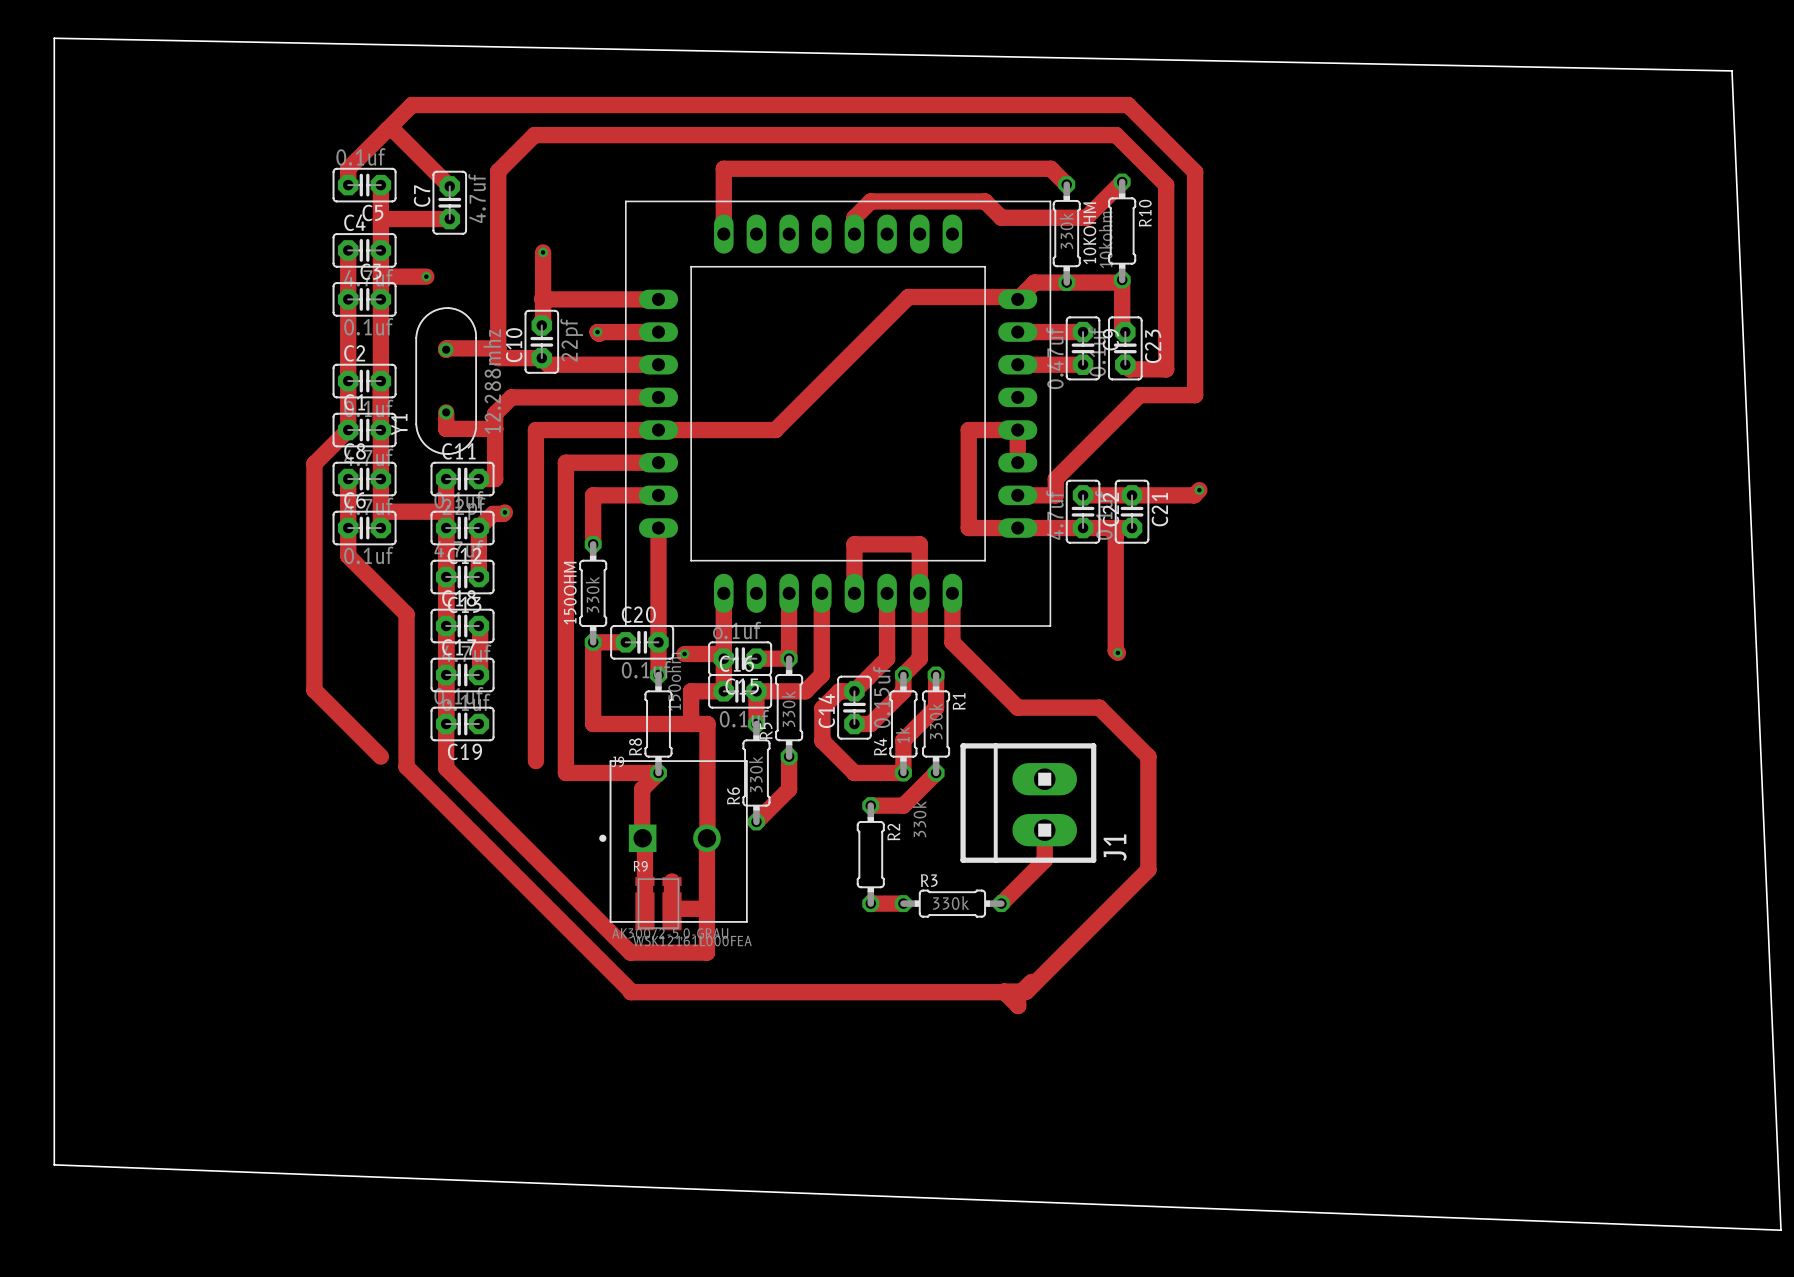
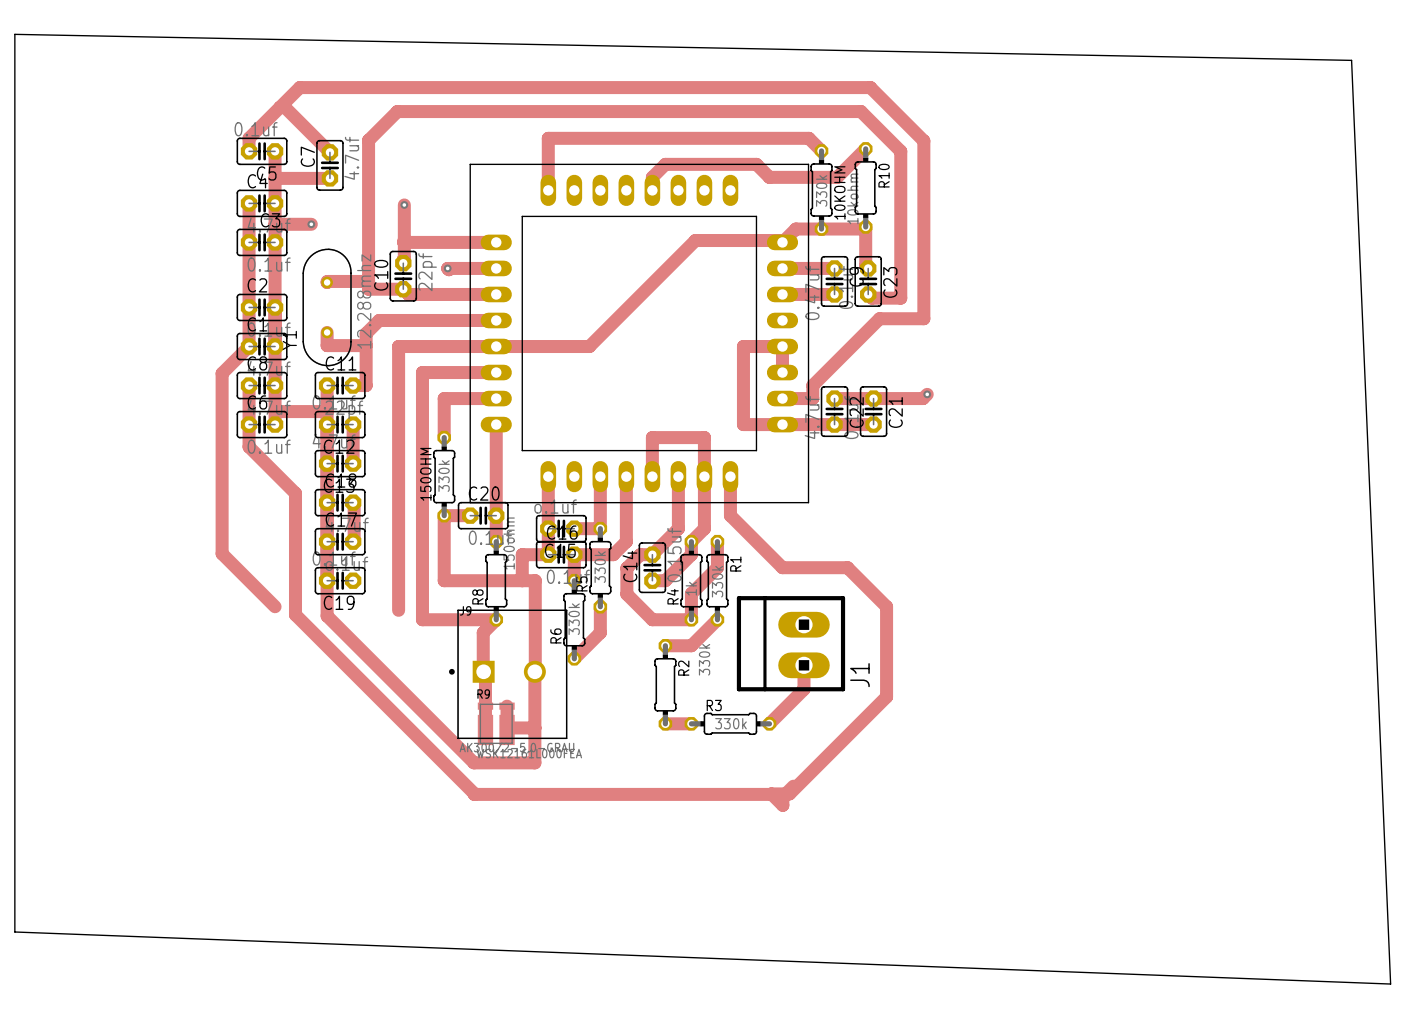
track: (504, 512) (492, 513) (478, 528) -> none
via: (504, 512) -> none
track: (1109, 528) (1115, 534) (1115, 650) (1117, 652) -> none
via: (1117, 652) -> none
track: (684, 653) (719, 653) (723, 658) -> none
via: (684, 653) -> none

